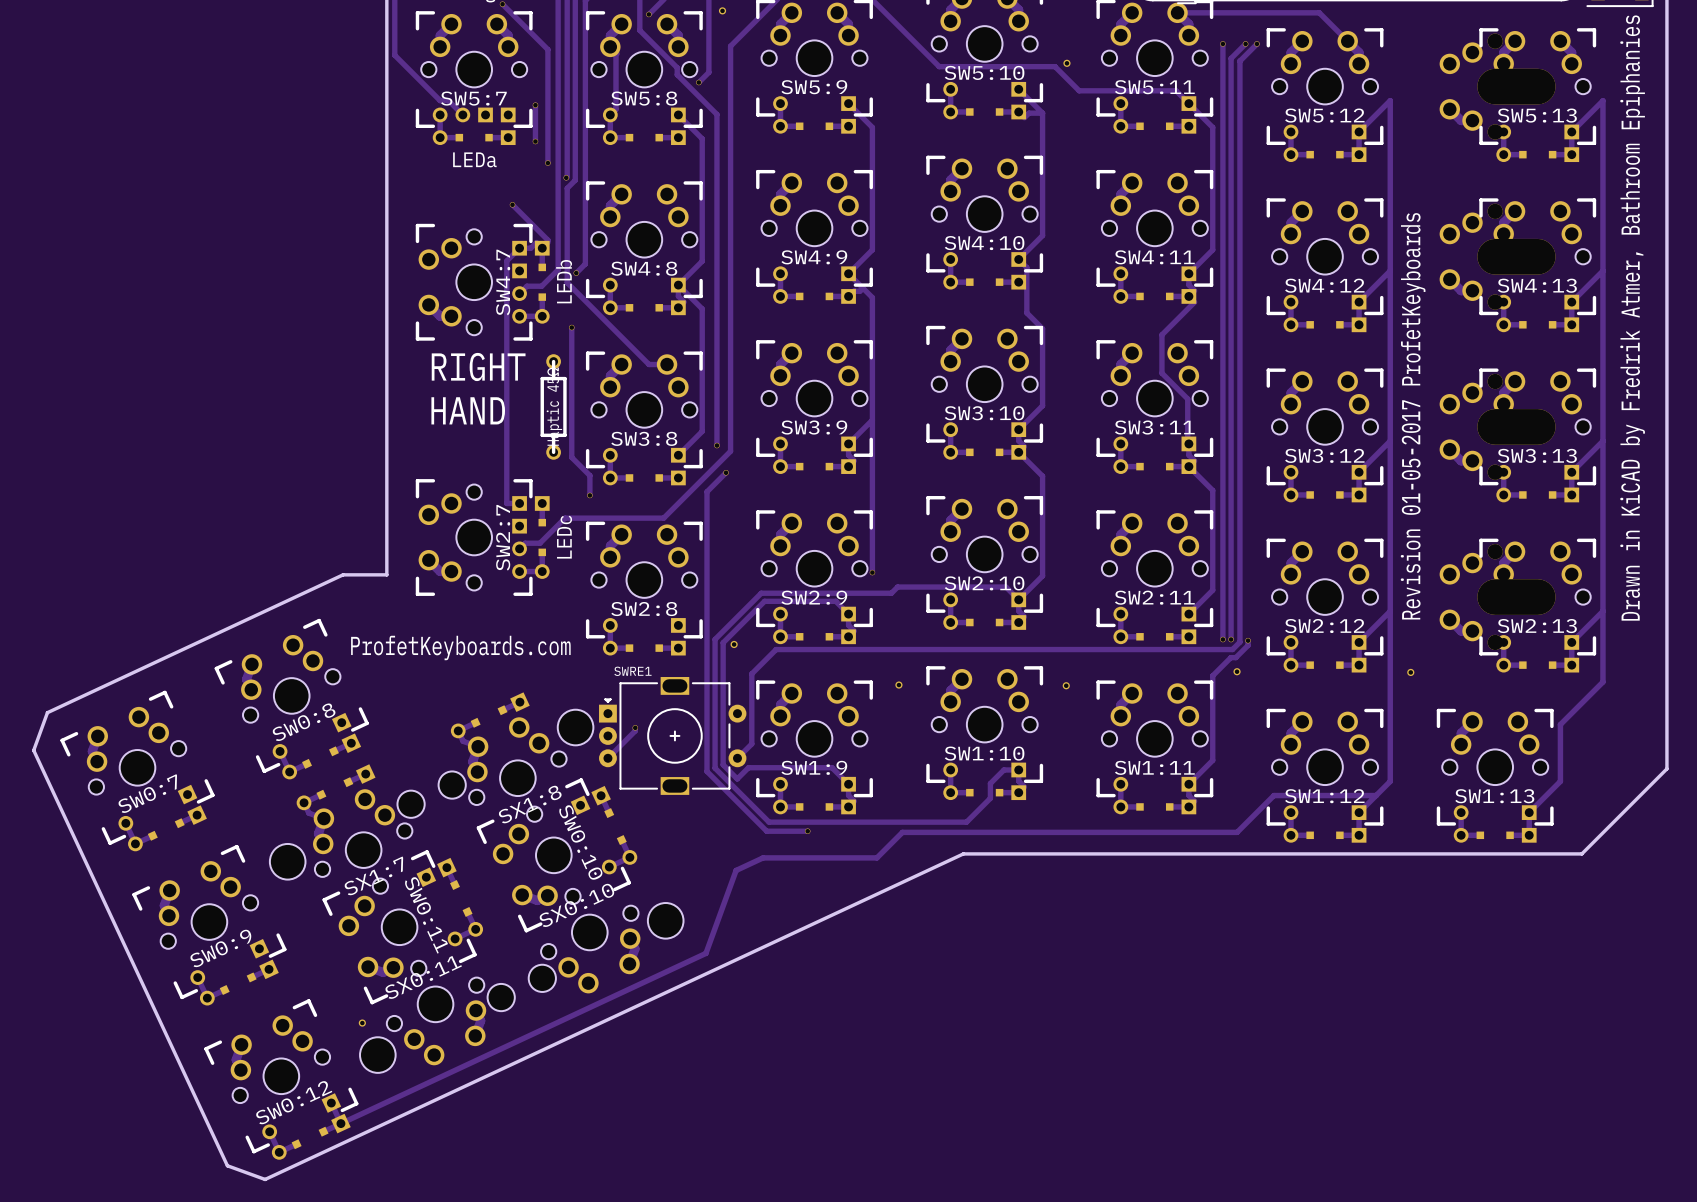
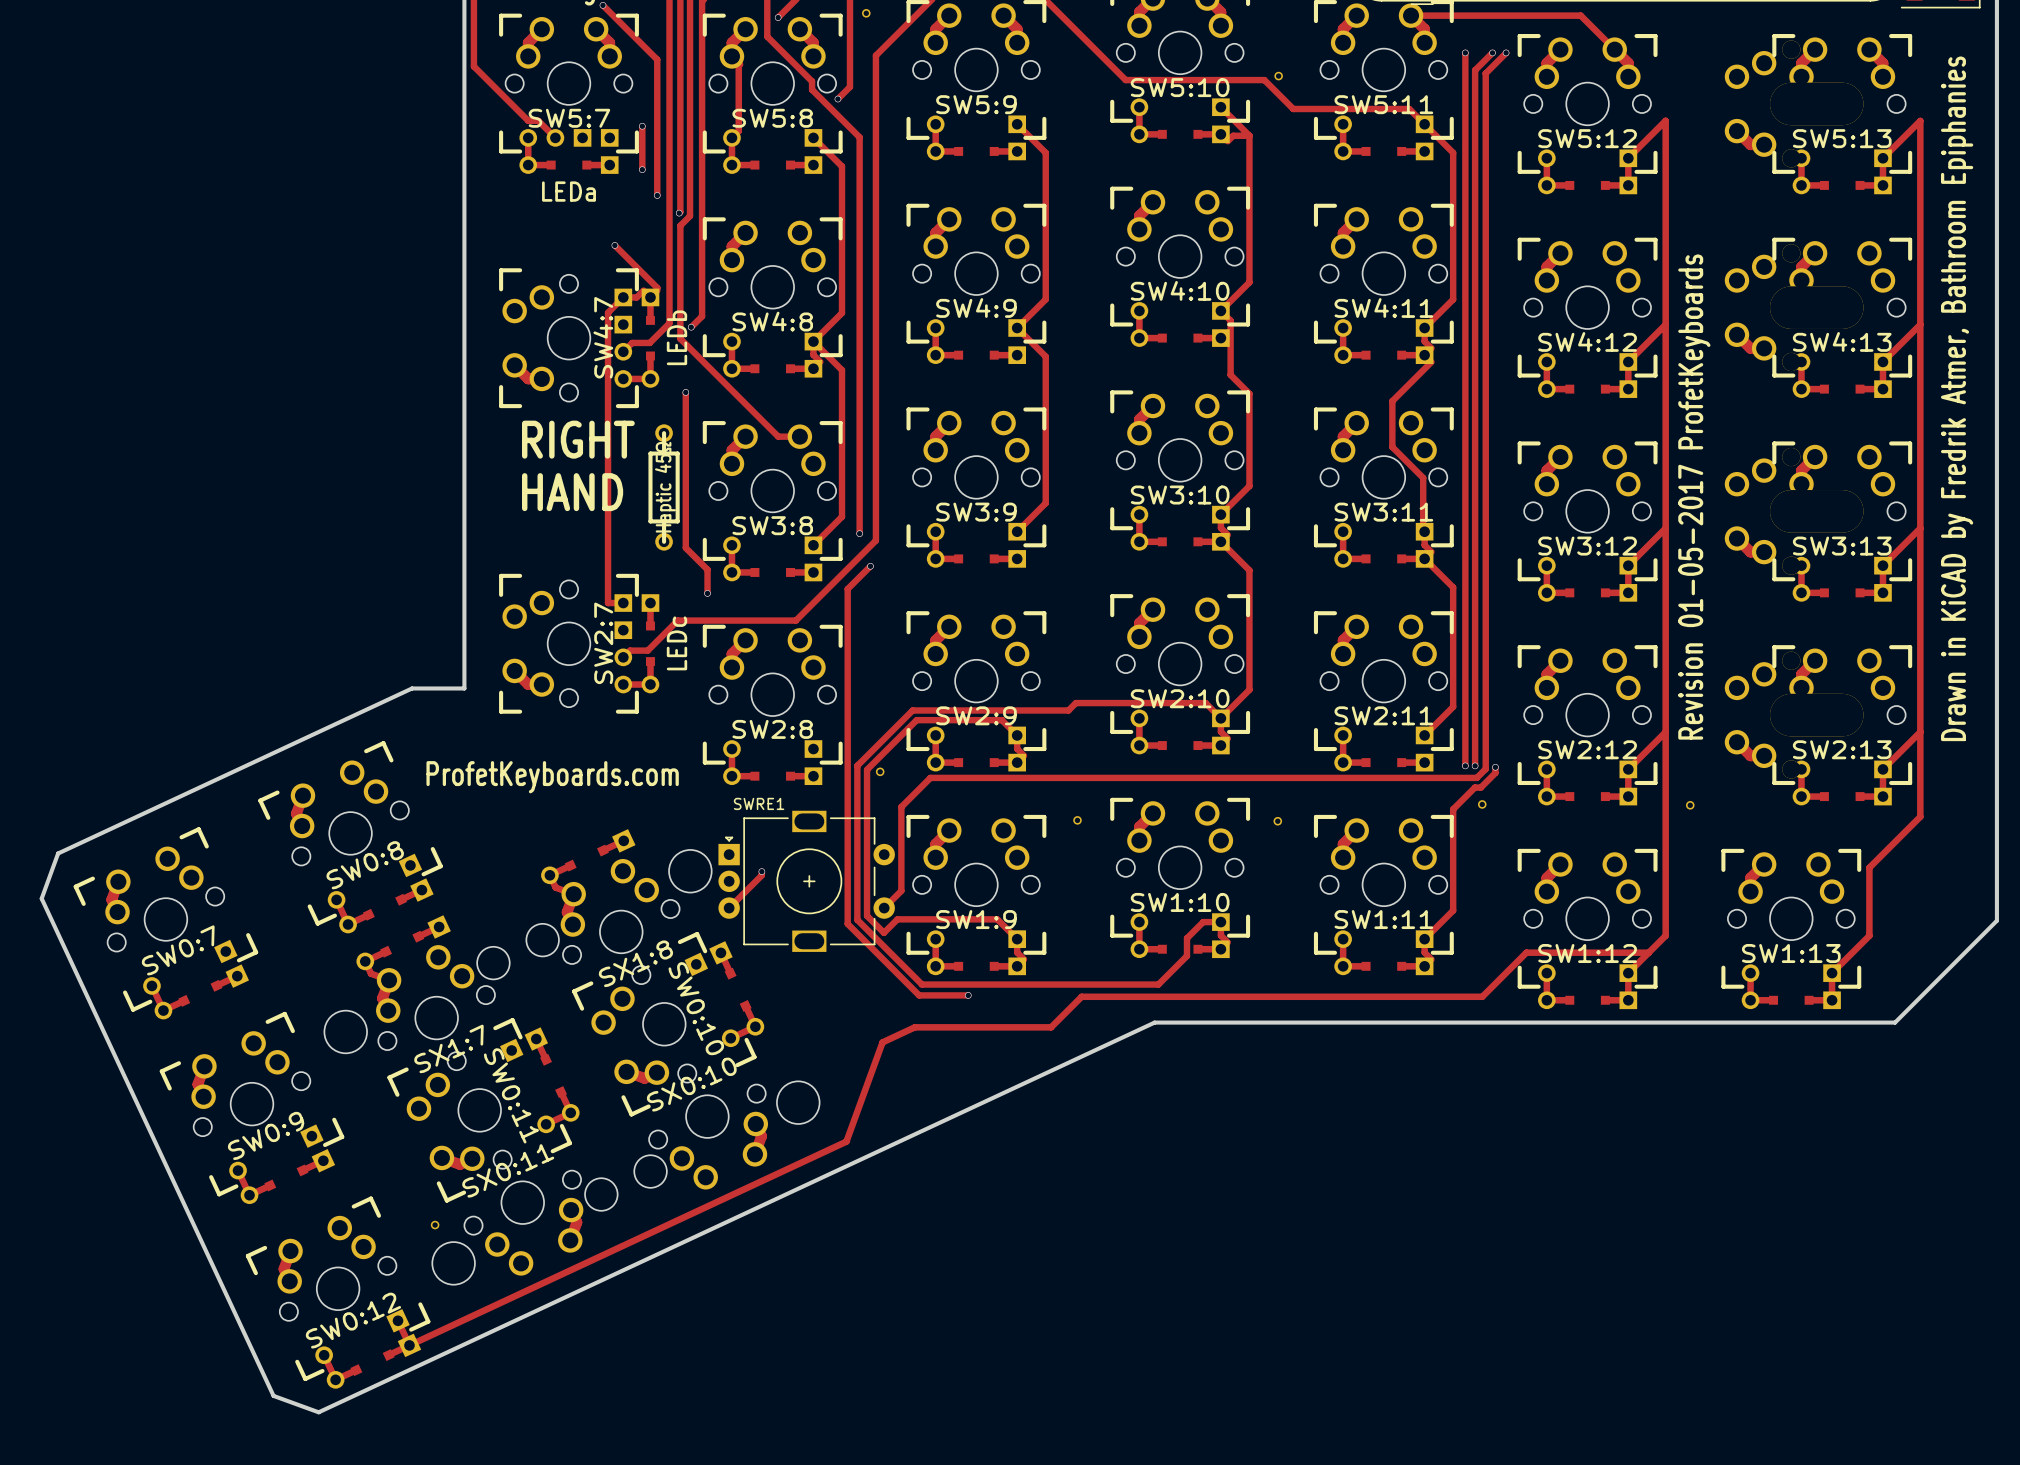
track: (862, 288) (859, 291) (854, 290) -> none
track: (872, 420) (872, 572) -> none
track: (848, 443) (848, 455) (854, 460) -> none
via: (872, 572) -> none

